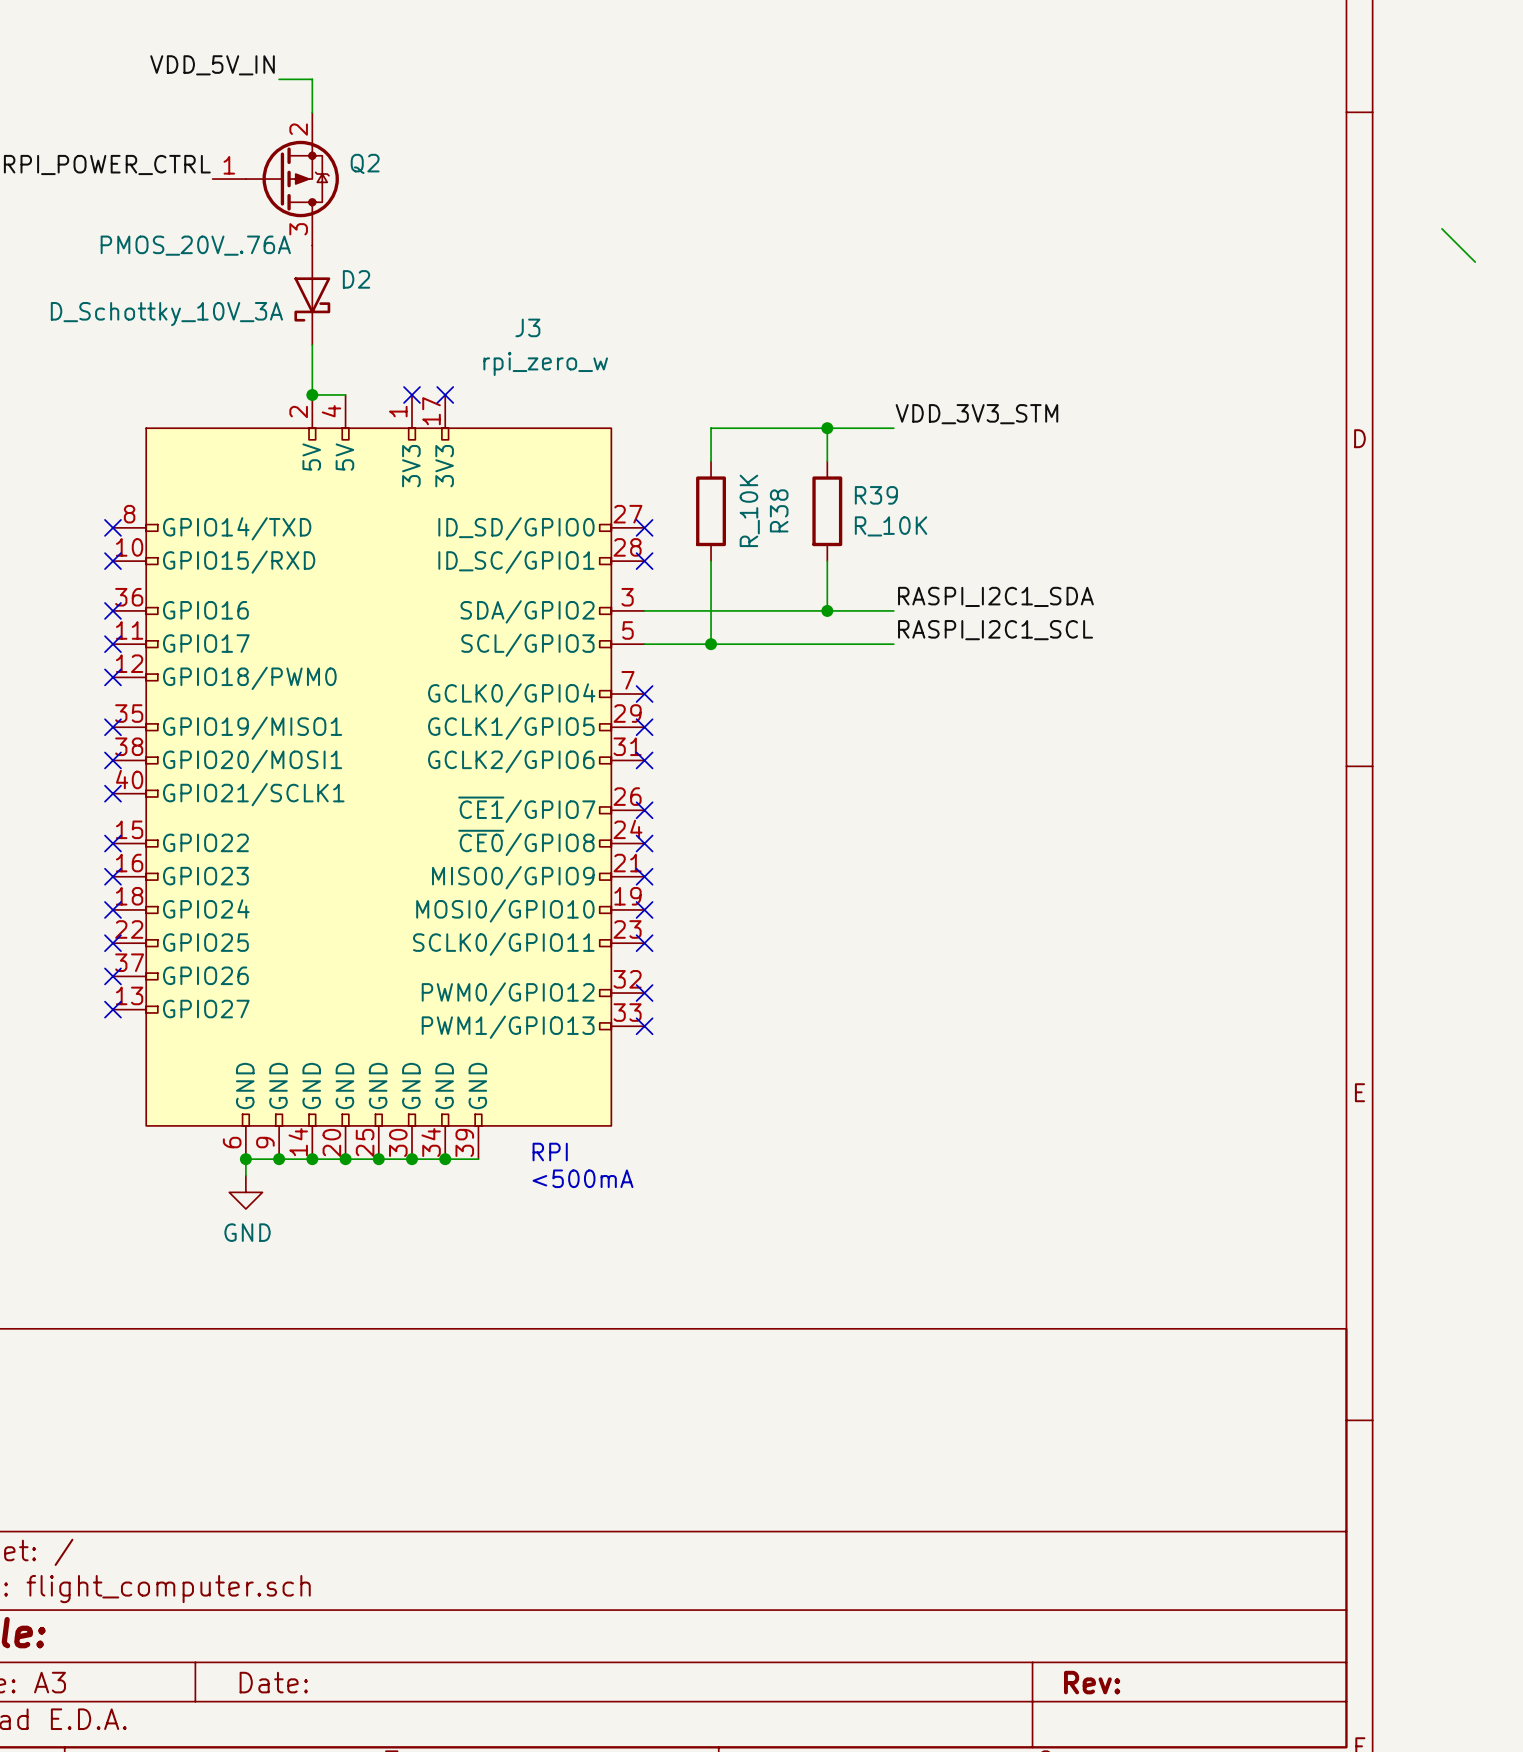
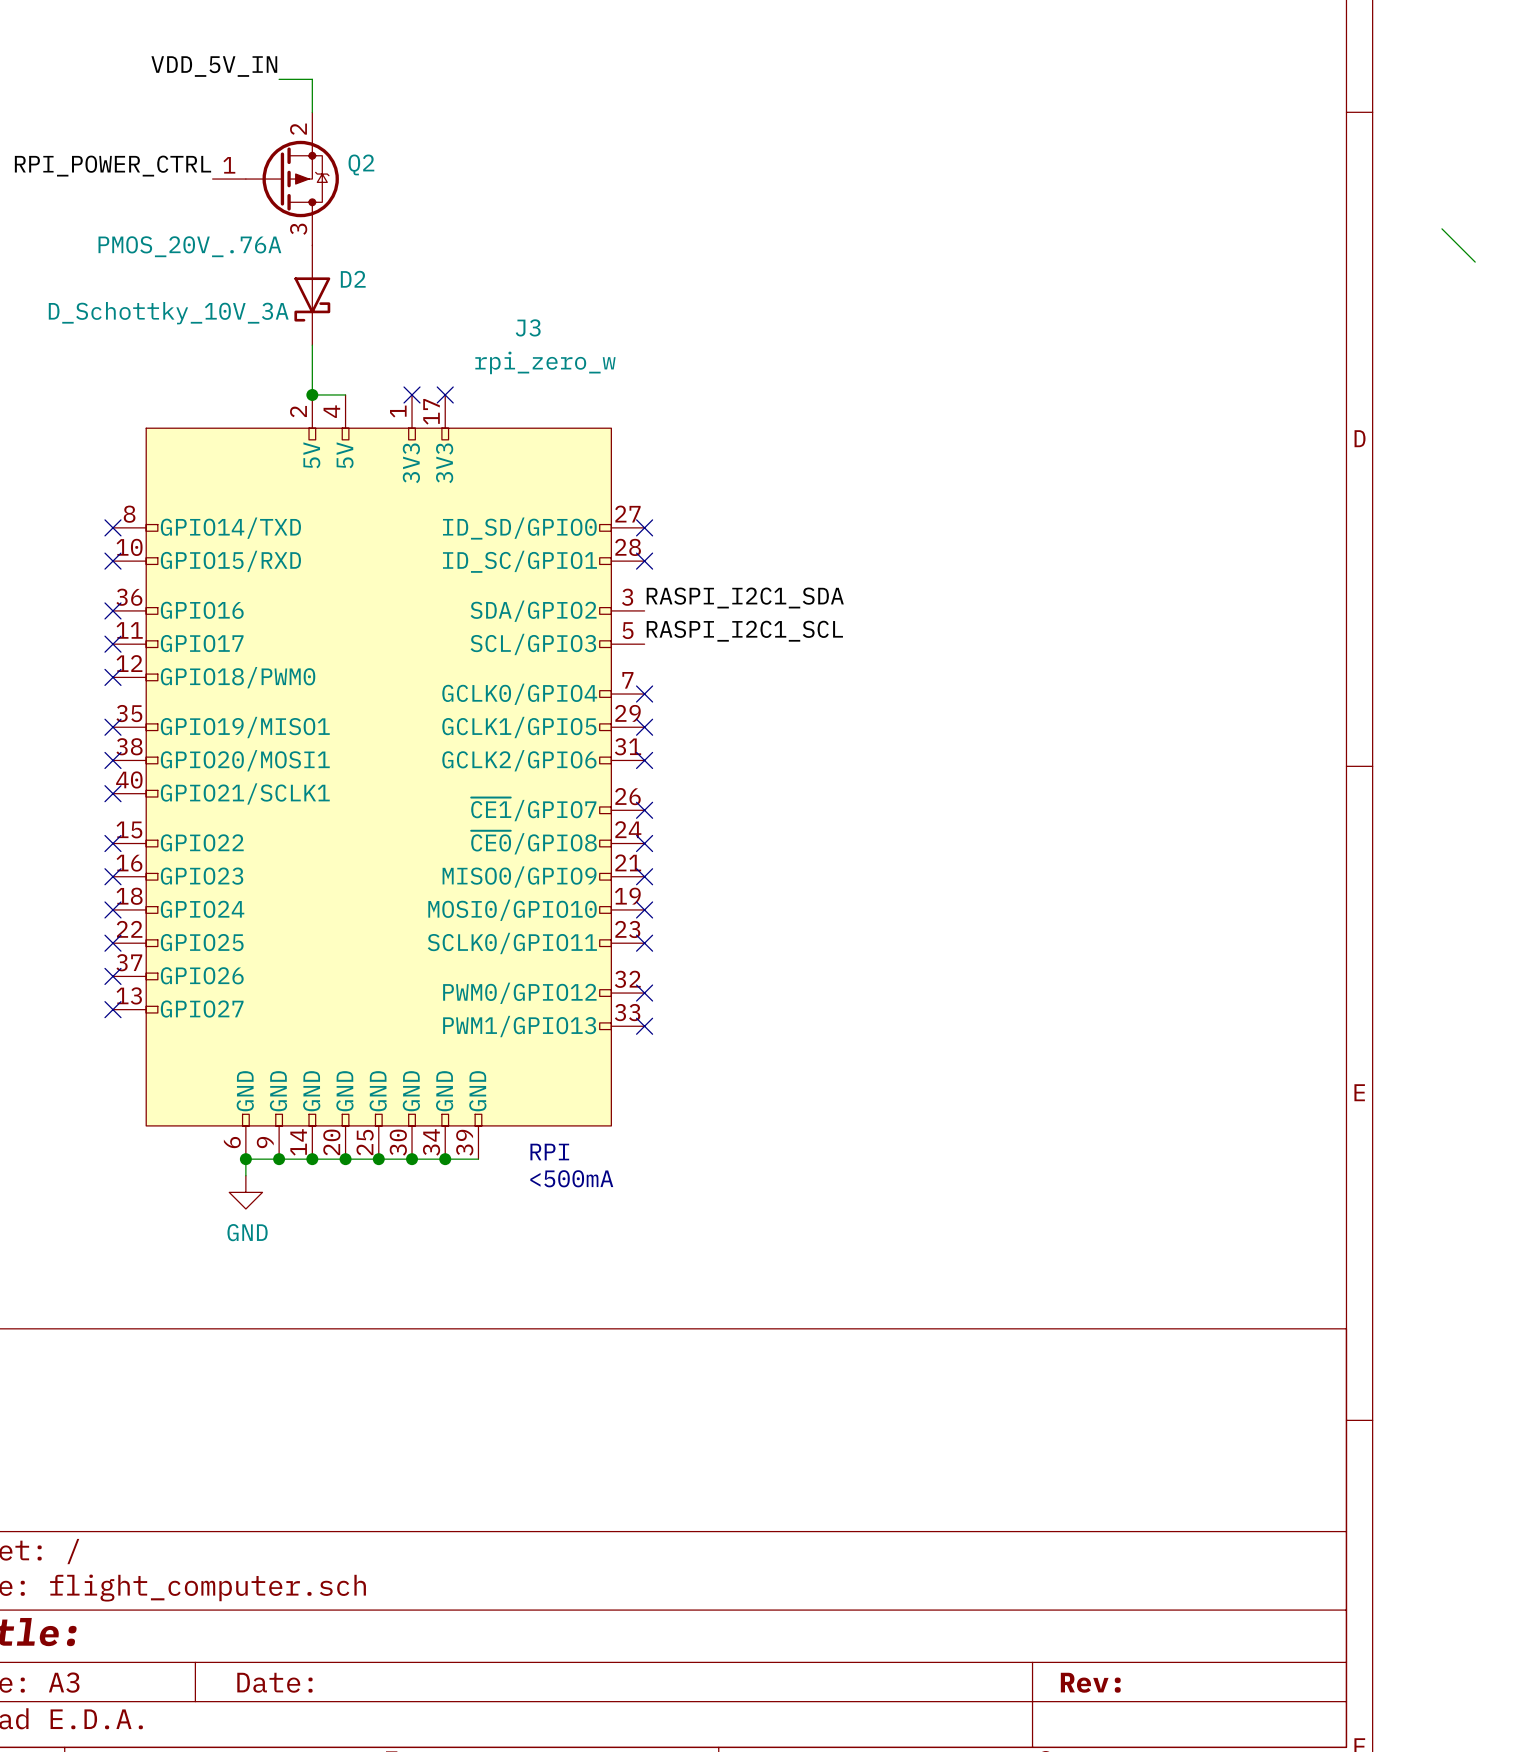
label: VDD_3V3_STM (976, 414) -> none
wire: (827, 428) (827, 461) -> none
junction: (827, 428) -> none
wire: (893, 428) (711, 428) (711, 461) -> none
R38: R_10K (711, 511) -> none
R39: R_10K (827, 511) -> none
wire: (711, 561) (711, 644) -> none
wire: (827, 561) (827, 610) -> none
label position: RASPI_I2C1_SDA (995, 596) -> RASPI_I2C1_SDA (745, 597)
wire: (644, 610) (893, 610) -> none
junction: (827, 610) -> none
label position: RASPI_I2C1_SCL (995, 630) -> RASPI_I2C1_SCL (744, 631)
wire: (644, 644) (893, 644) -> none
junction: (711, 644) -> none

